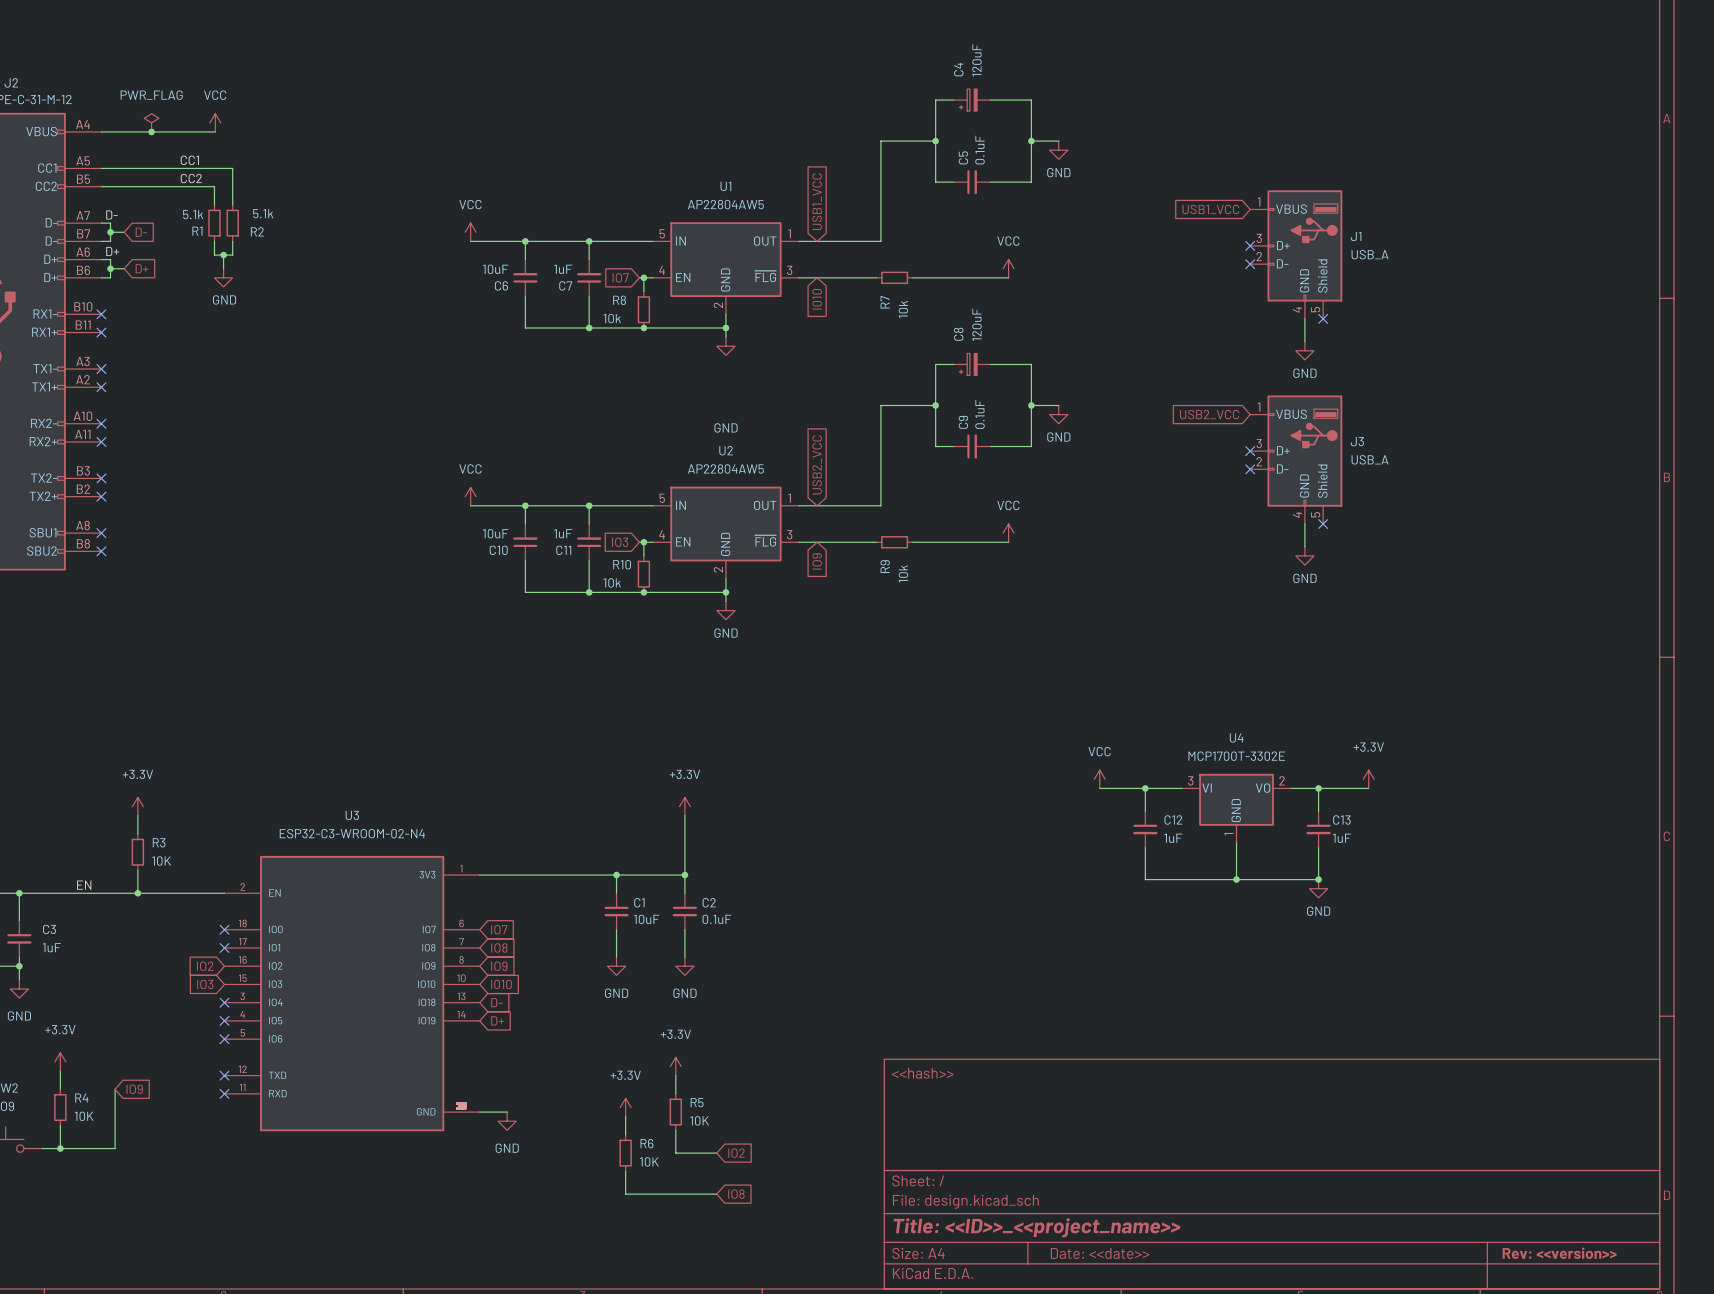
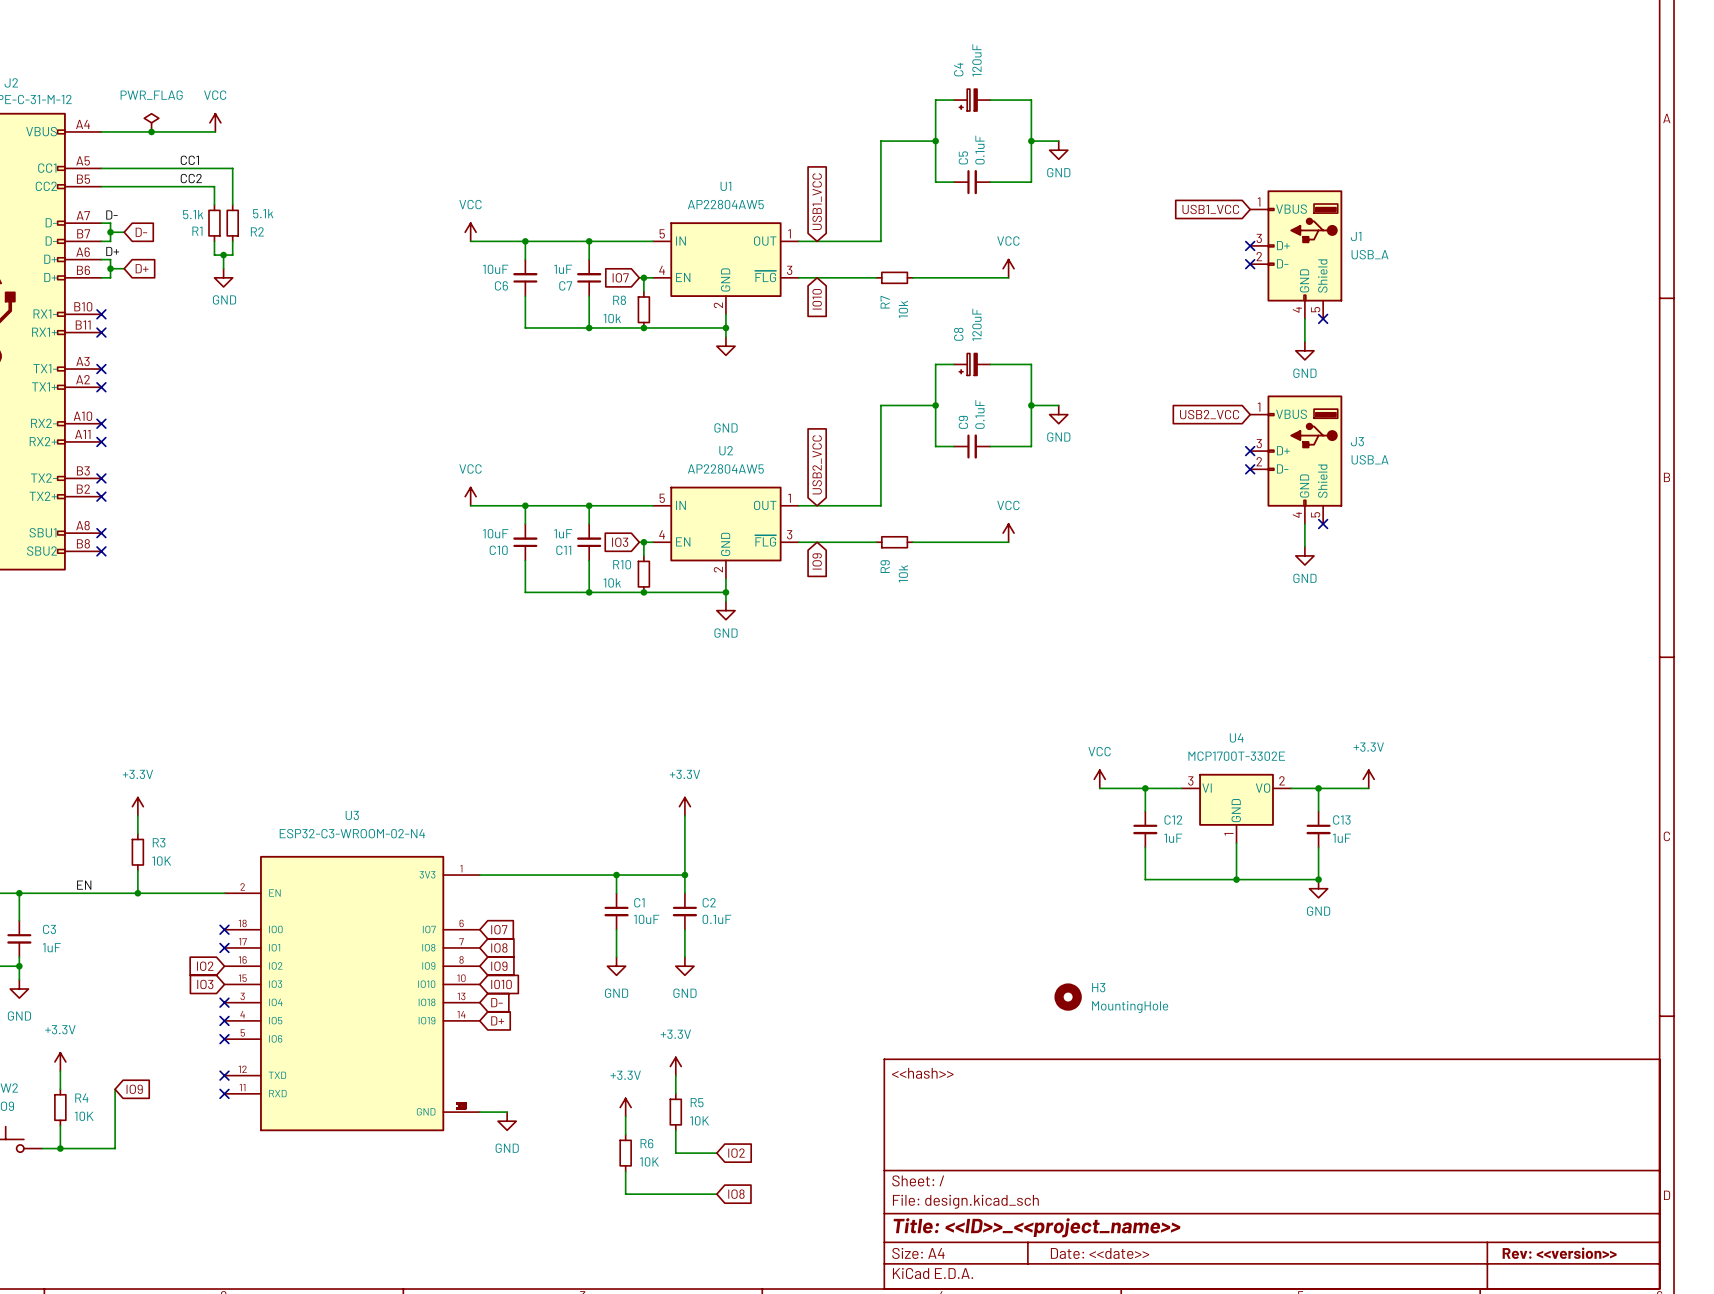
H3: none -> MountingHole (1068, 997)

